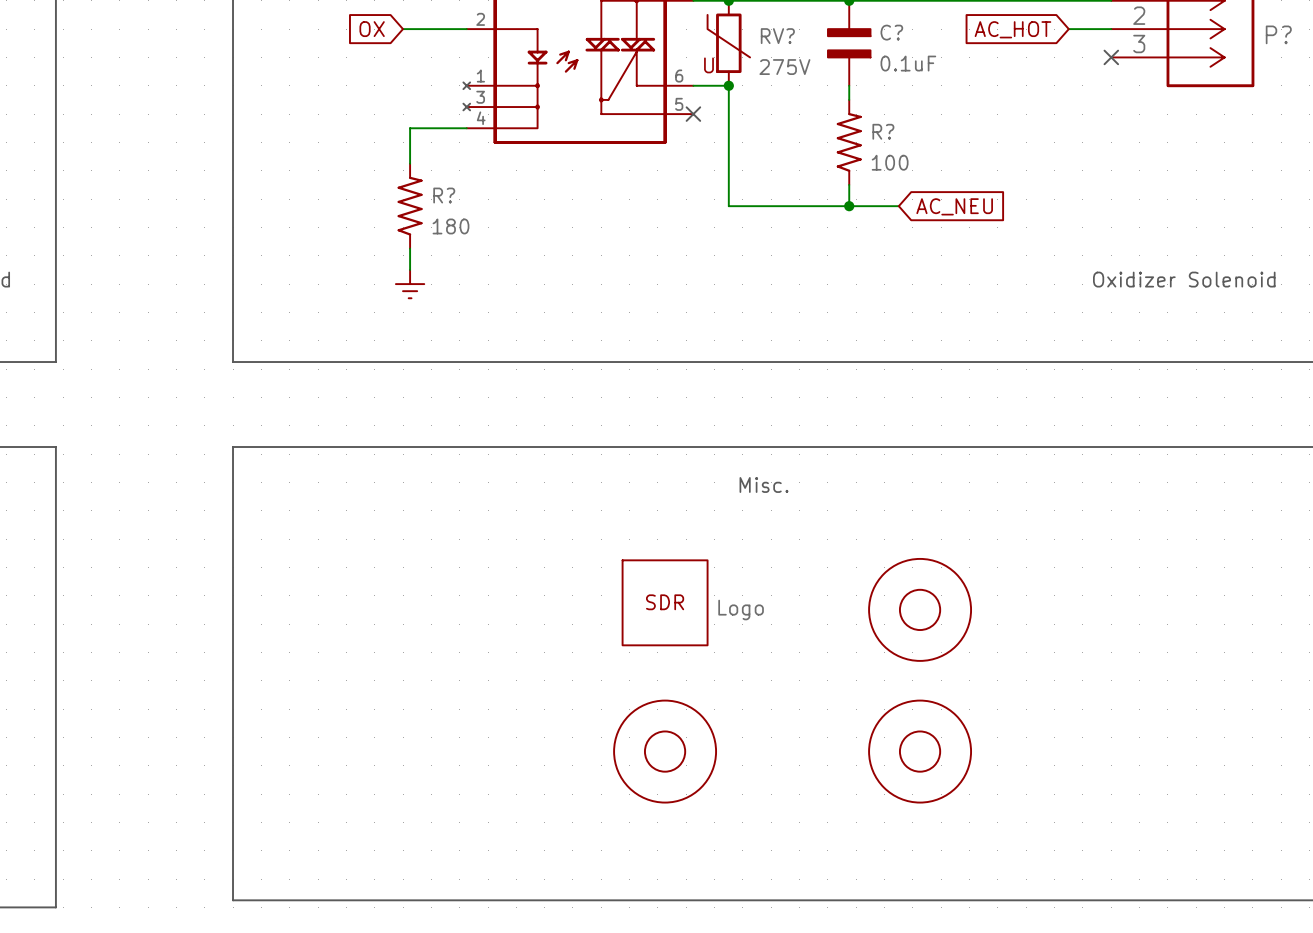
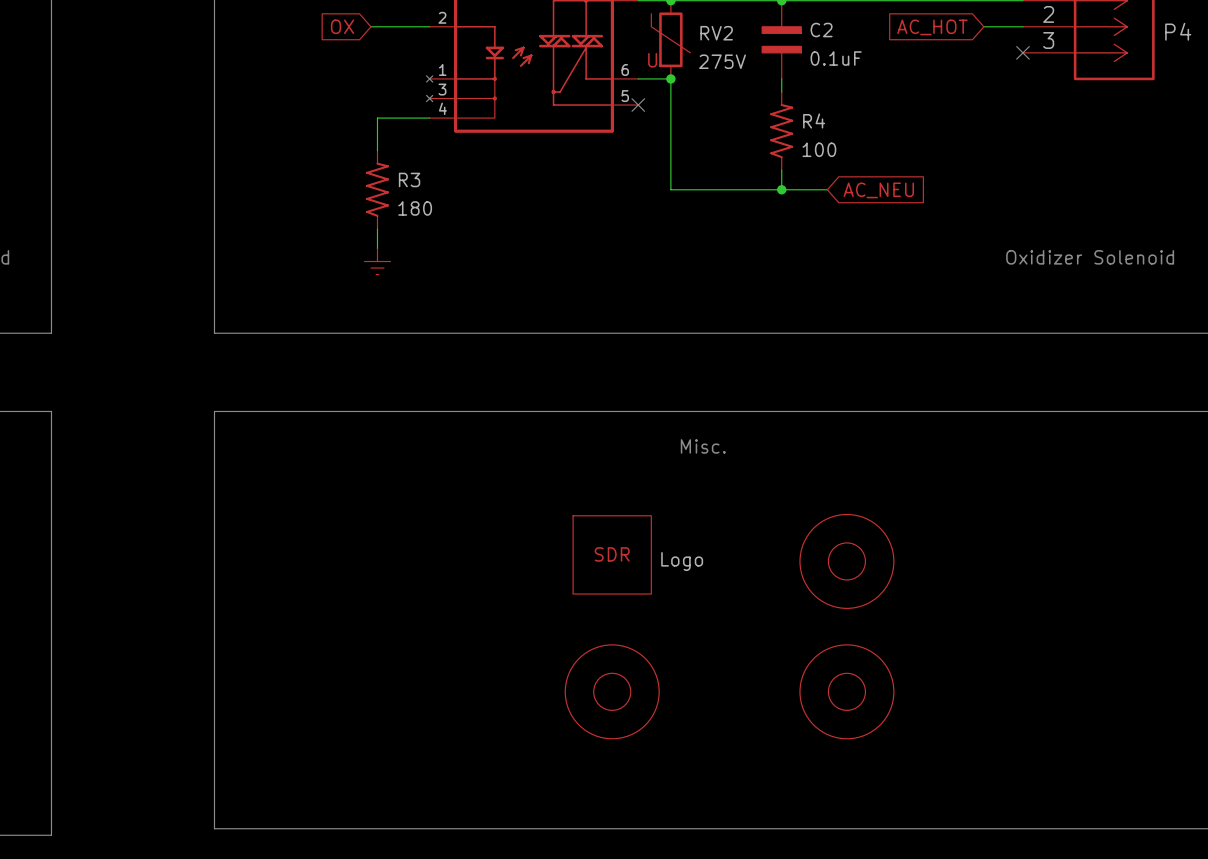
C? name: C? (891, 32) -> C2 (821, 30)
P? name: P? (1278, 34) -> P4 (1178, 31)
RV? name: RV? (777, 36) -> RV2 (716, 33)
R? name: R? (883, 131) -> R4 (814, 120)
R? name: R? (444, 195) -> R3 (409, 179)

